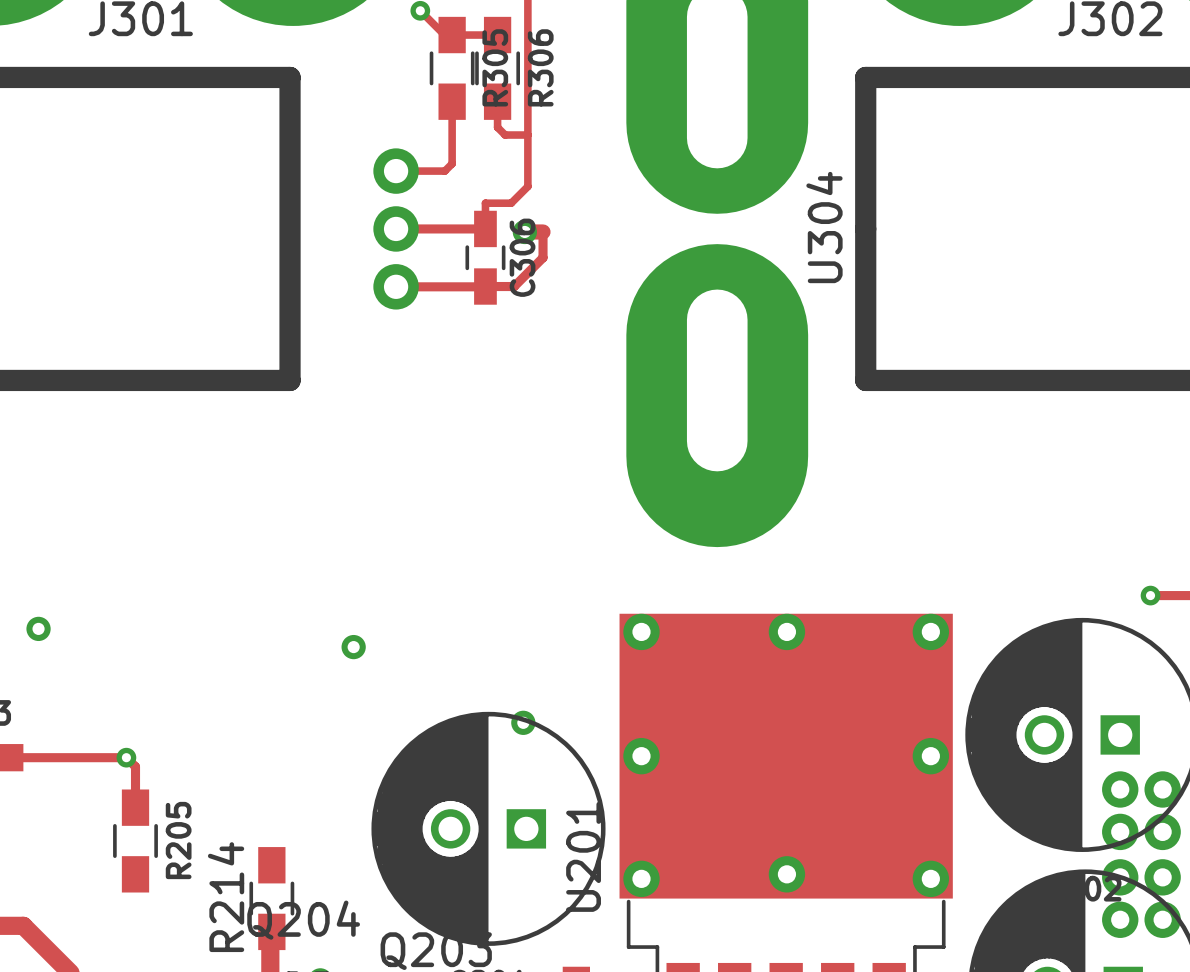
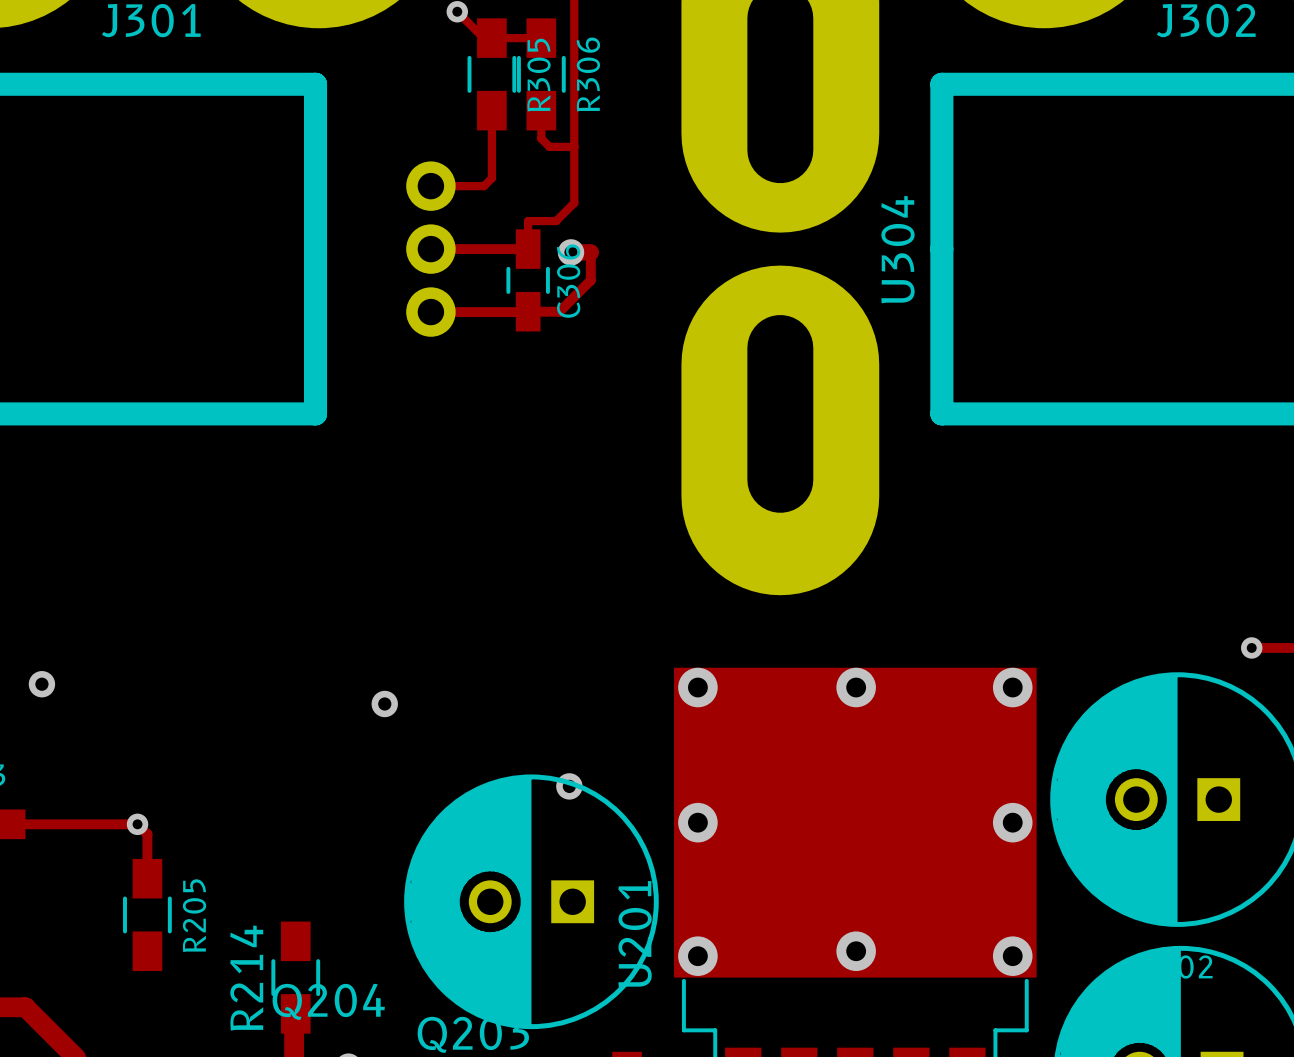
via: (1120, 789) -> none
via: (1162, 789) -> none
via: (1120, 831) -> none
via: (1162, 831) -> none
via: (1120, 877) -> none
via: (1162, 877) -> none
via: (1120, 919) -> none
via: (1162, 919) -> none

